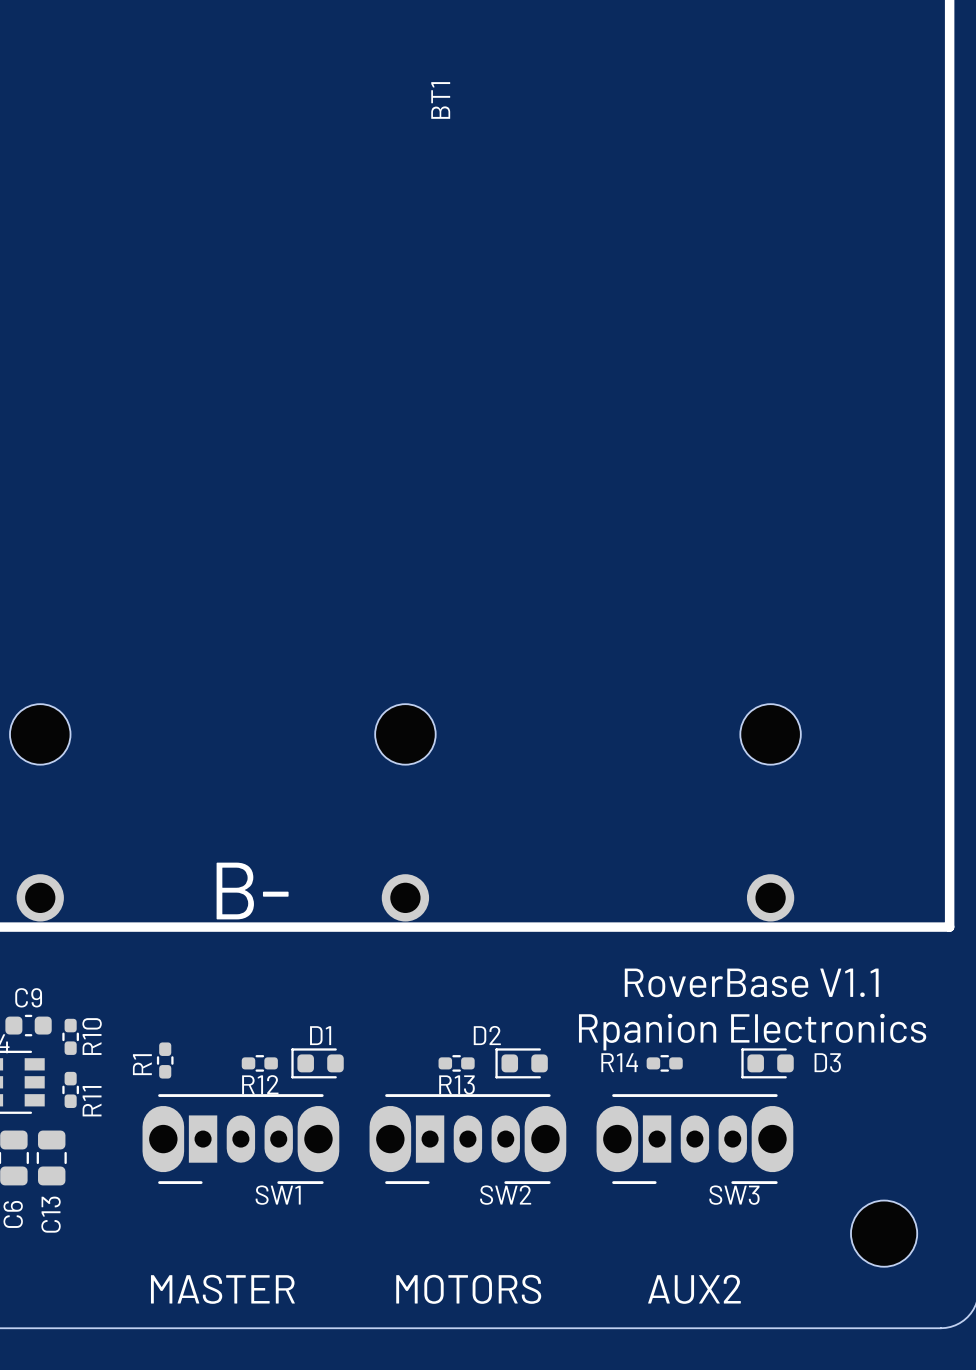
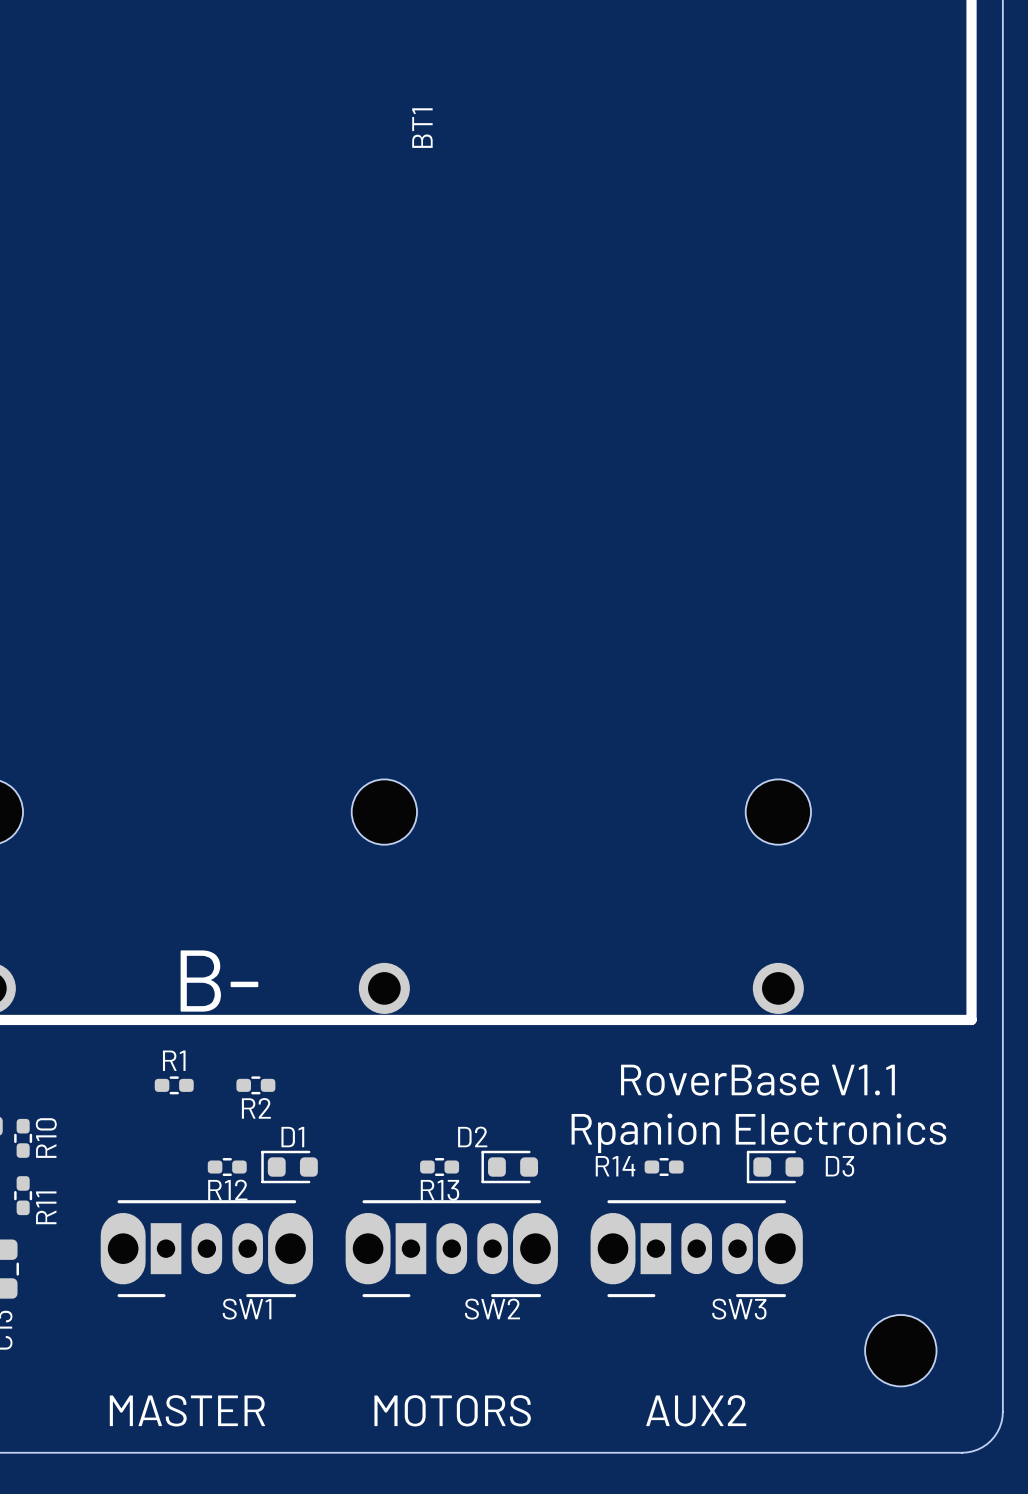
R2: none -> (255, 1085)
R1 rotation: 0° (165, 1060) -> 90° clockwise (174, 1085)
R1 position: (165, 1060) -> (174, 1085)

